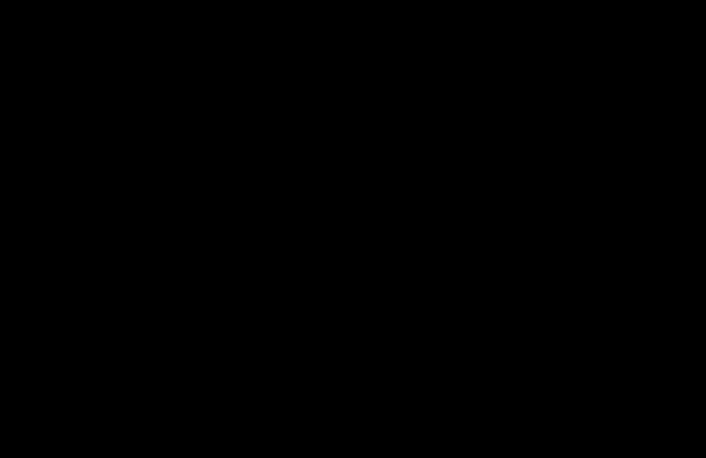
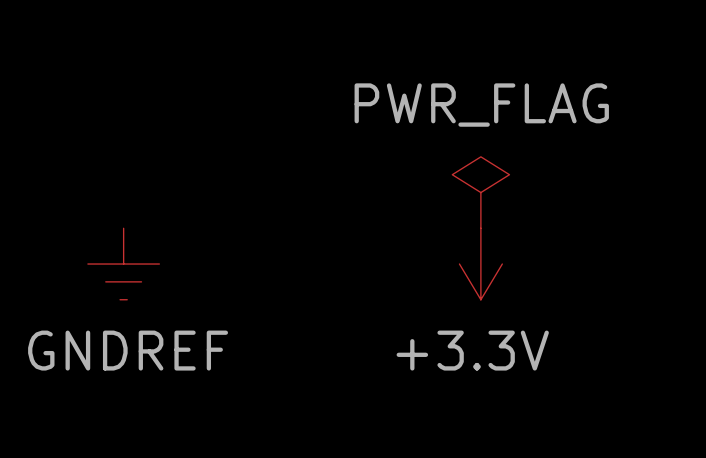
power symbol: none -> PWR_FLAG (480, 192)
power symbol: none -> GNDREF (123, 264)
power symbol: none -> +3.3V (480, 264)

